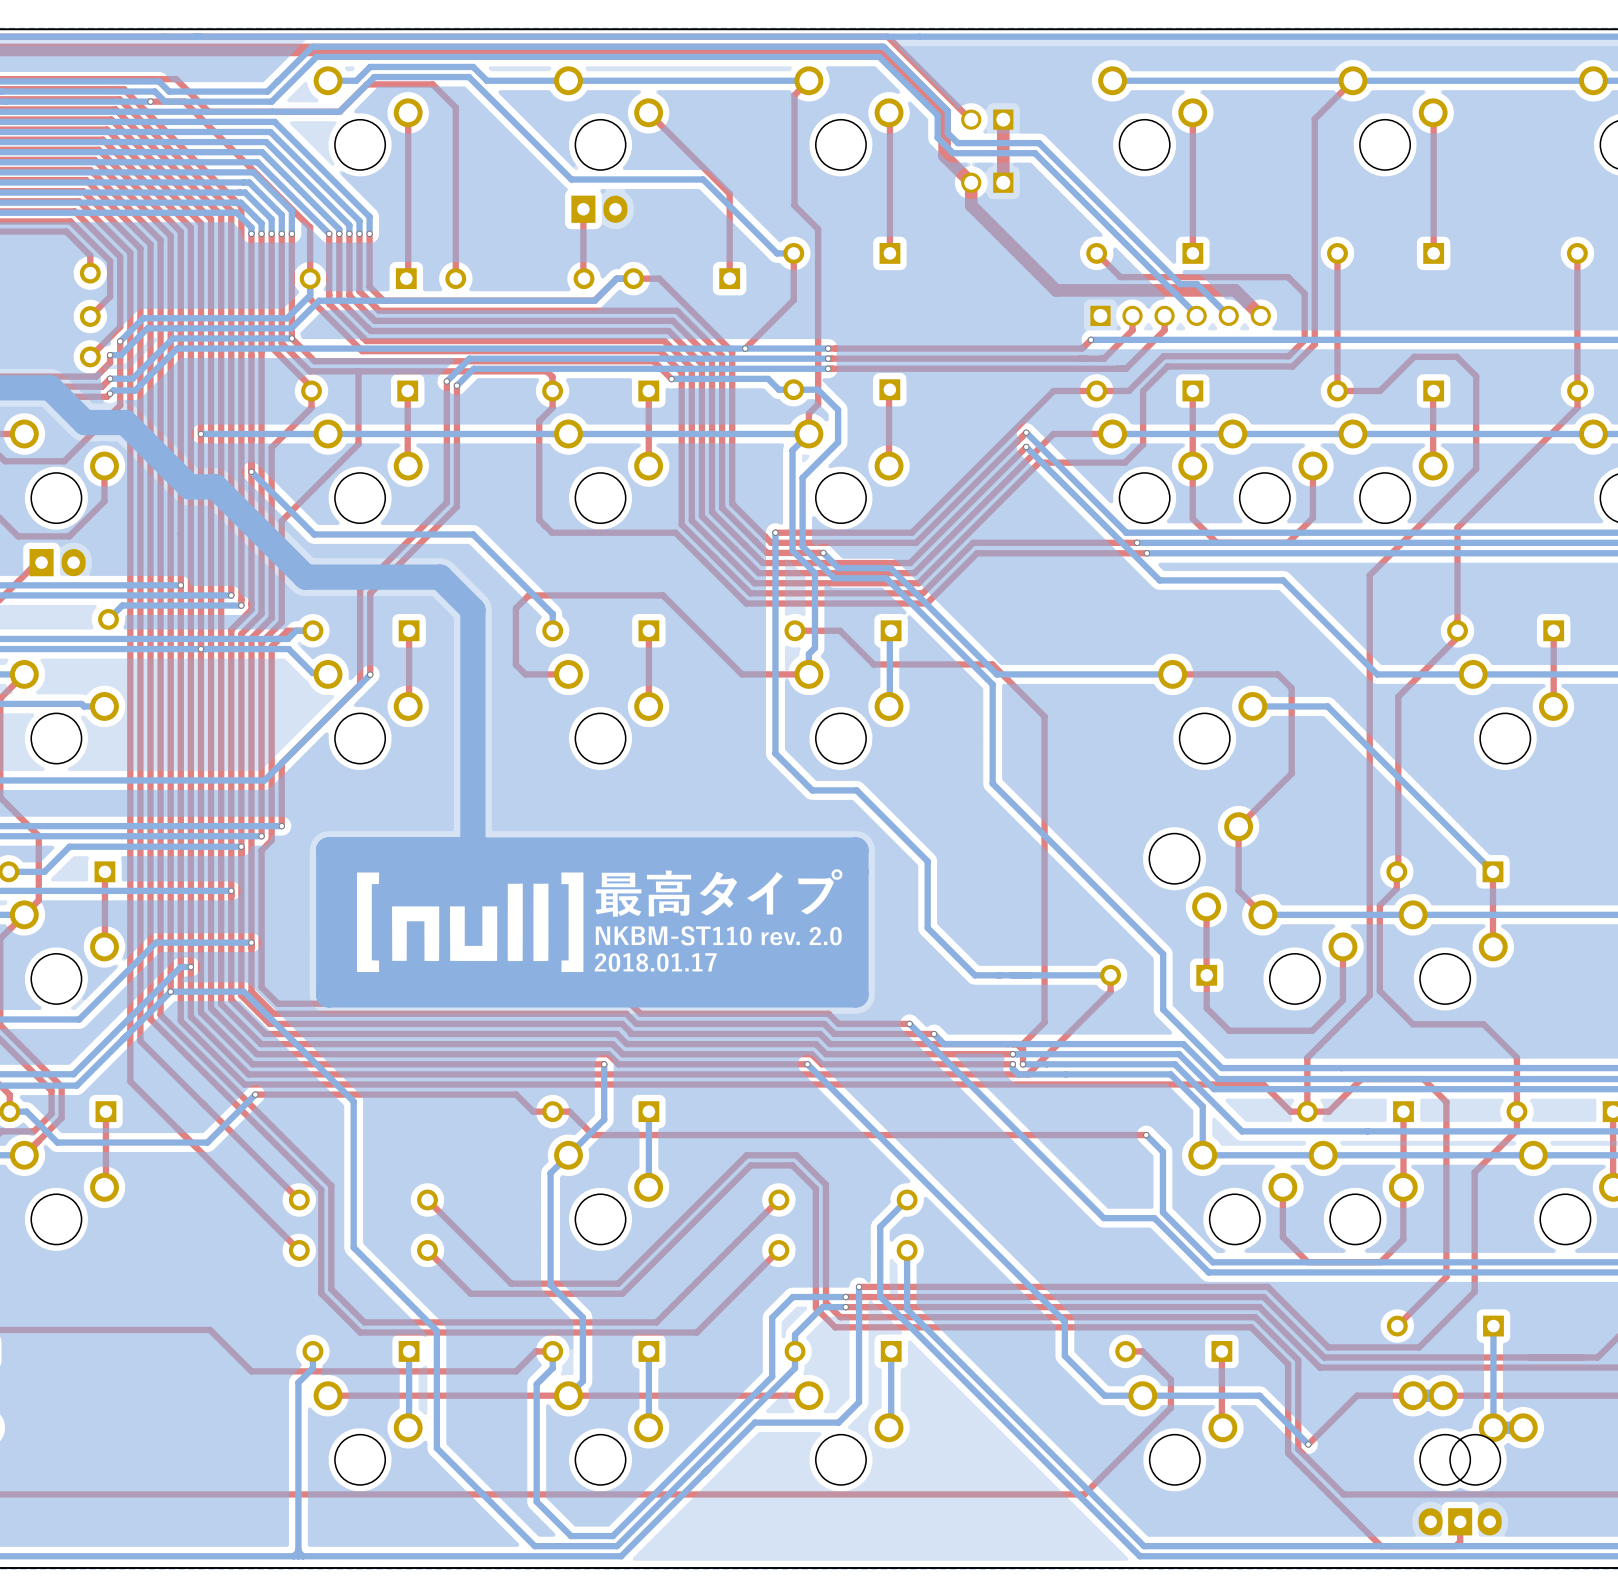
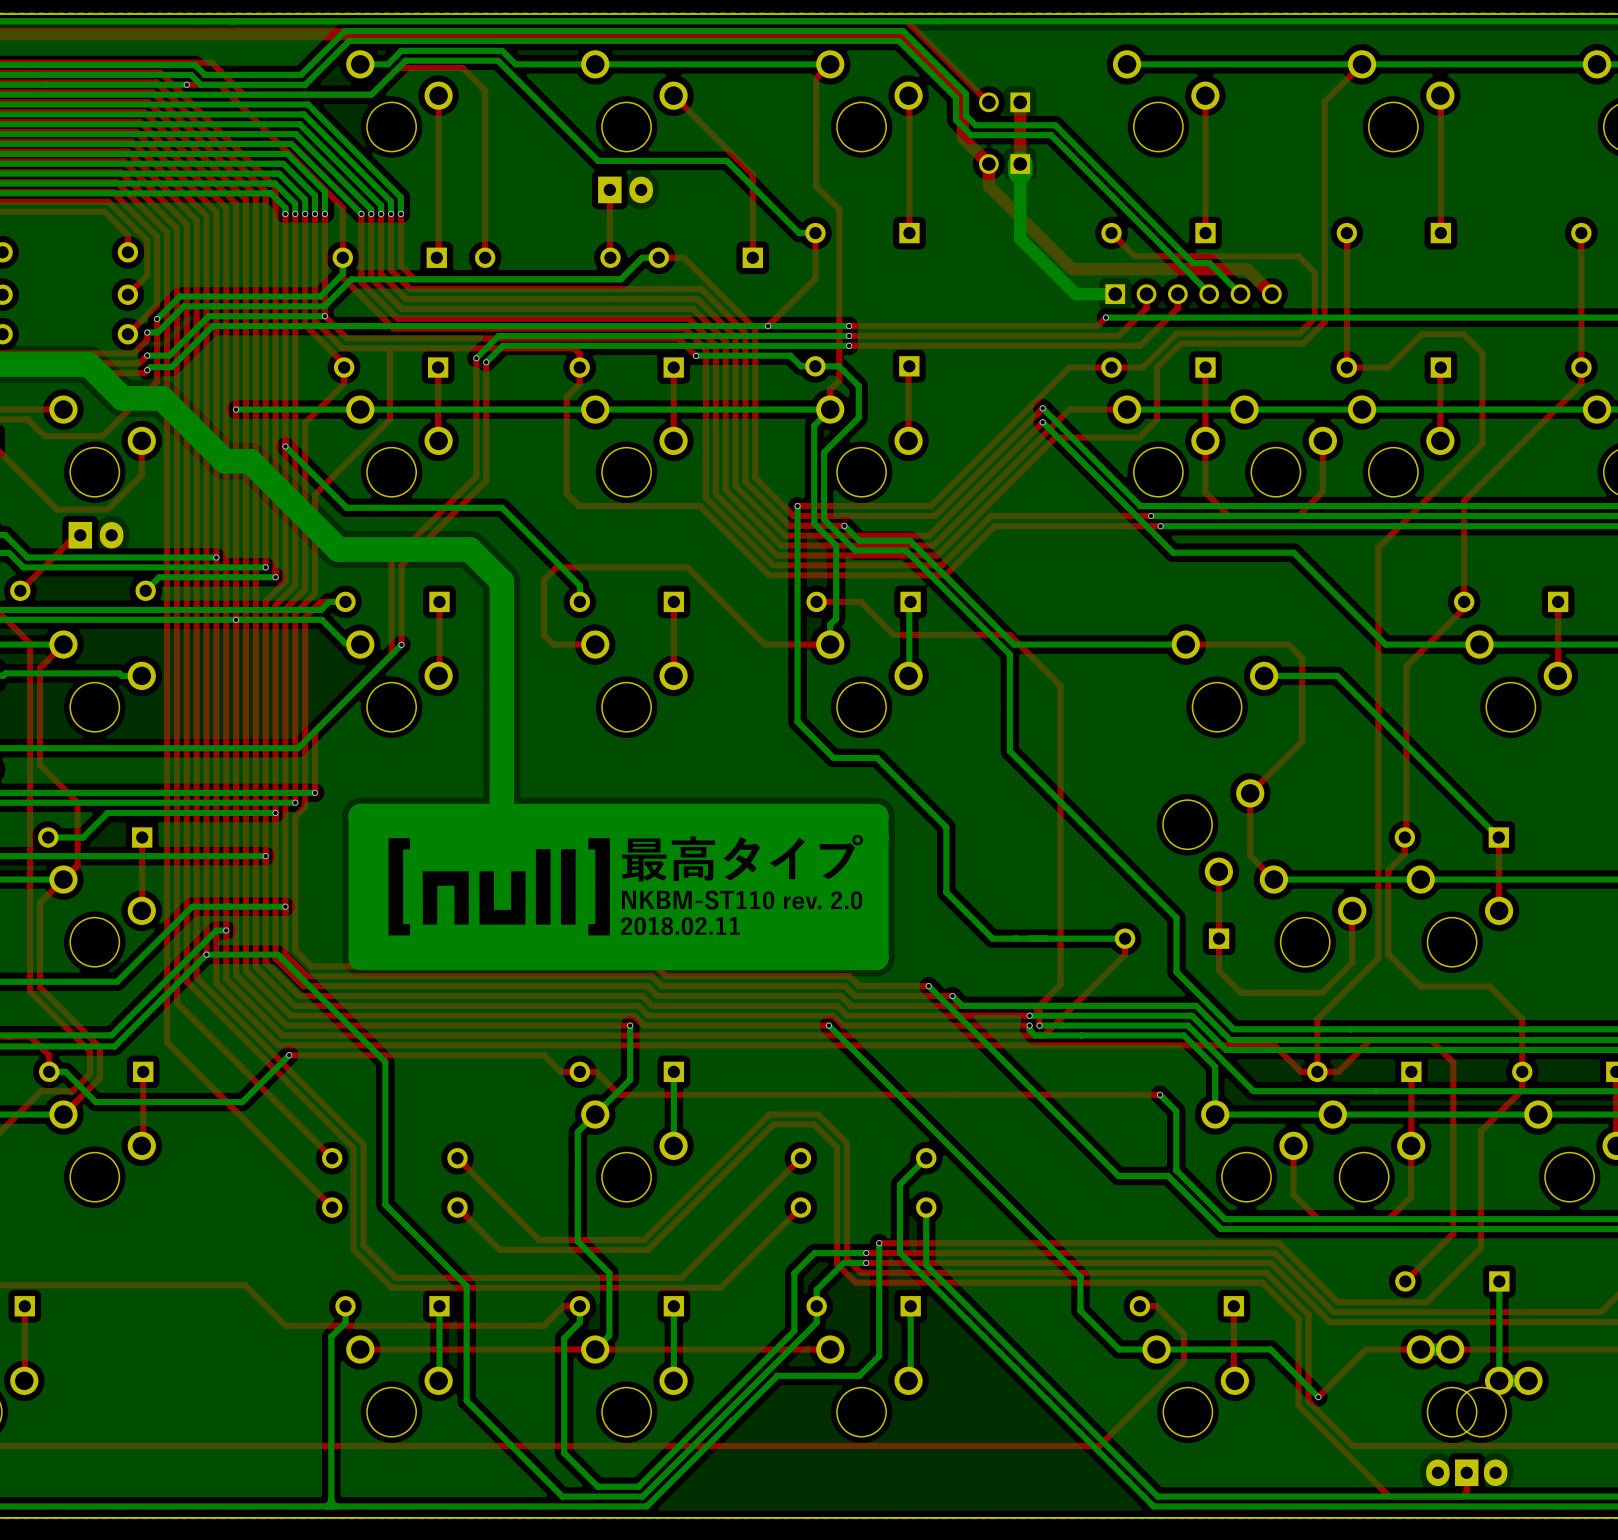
bottom track: none -> (1020, 171) (1020, 164) (1020, 238) (1075, 294) (1115, 294)
drawing shape: [332, 859, 854, 993] -> [369, 825, 880, 956]

